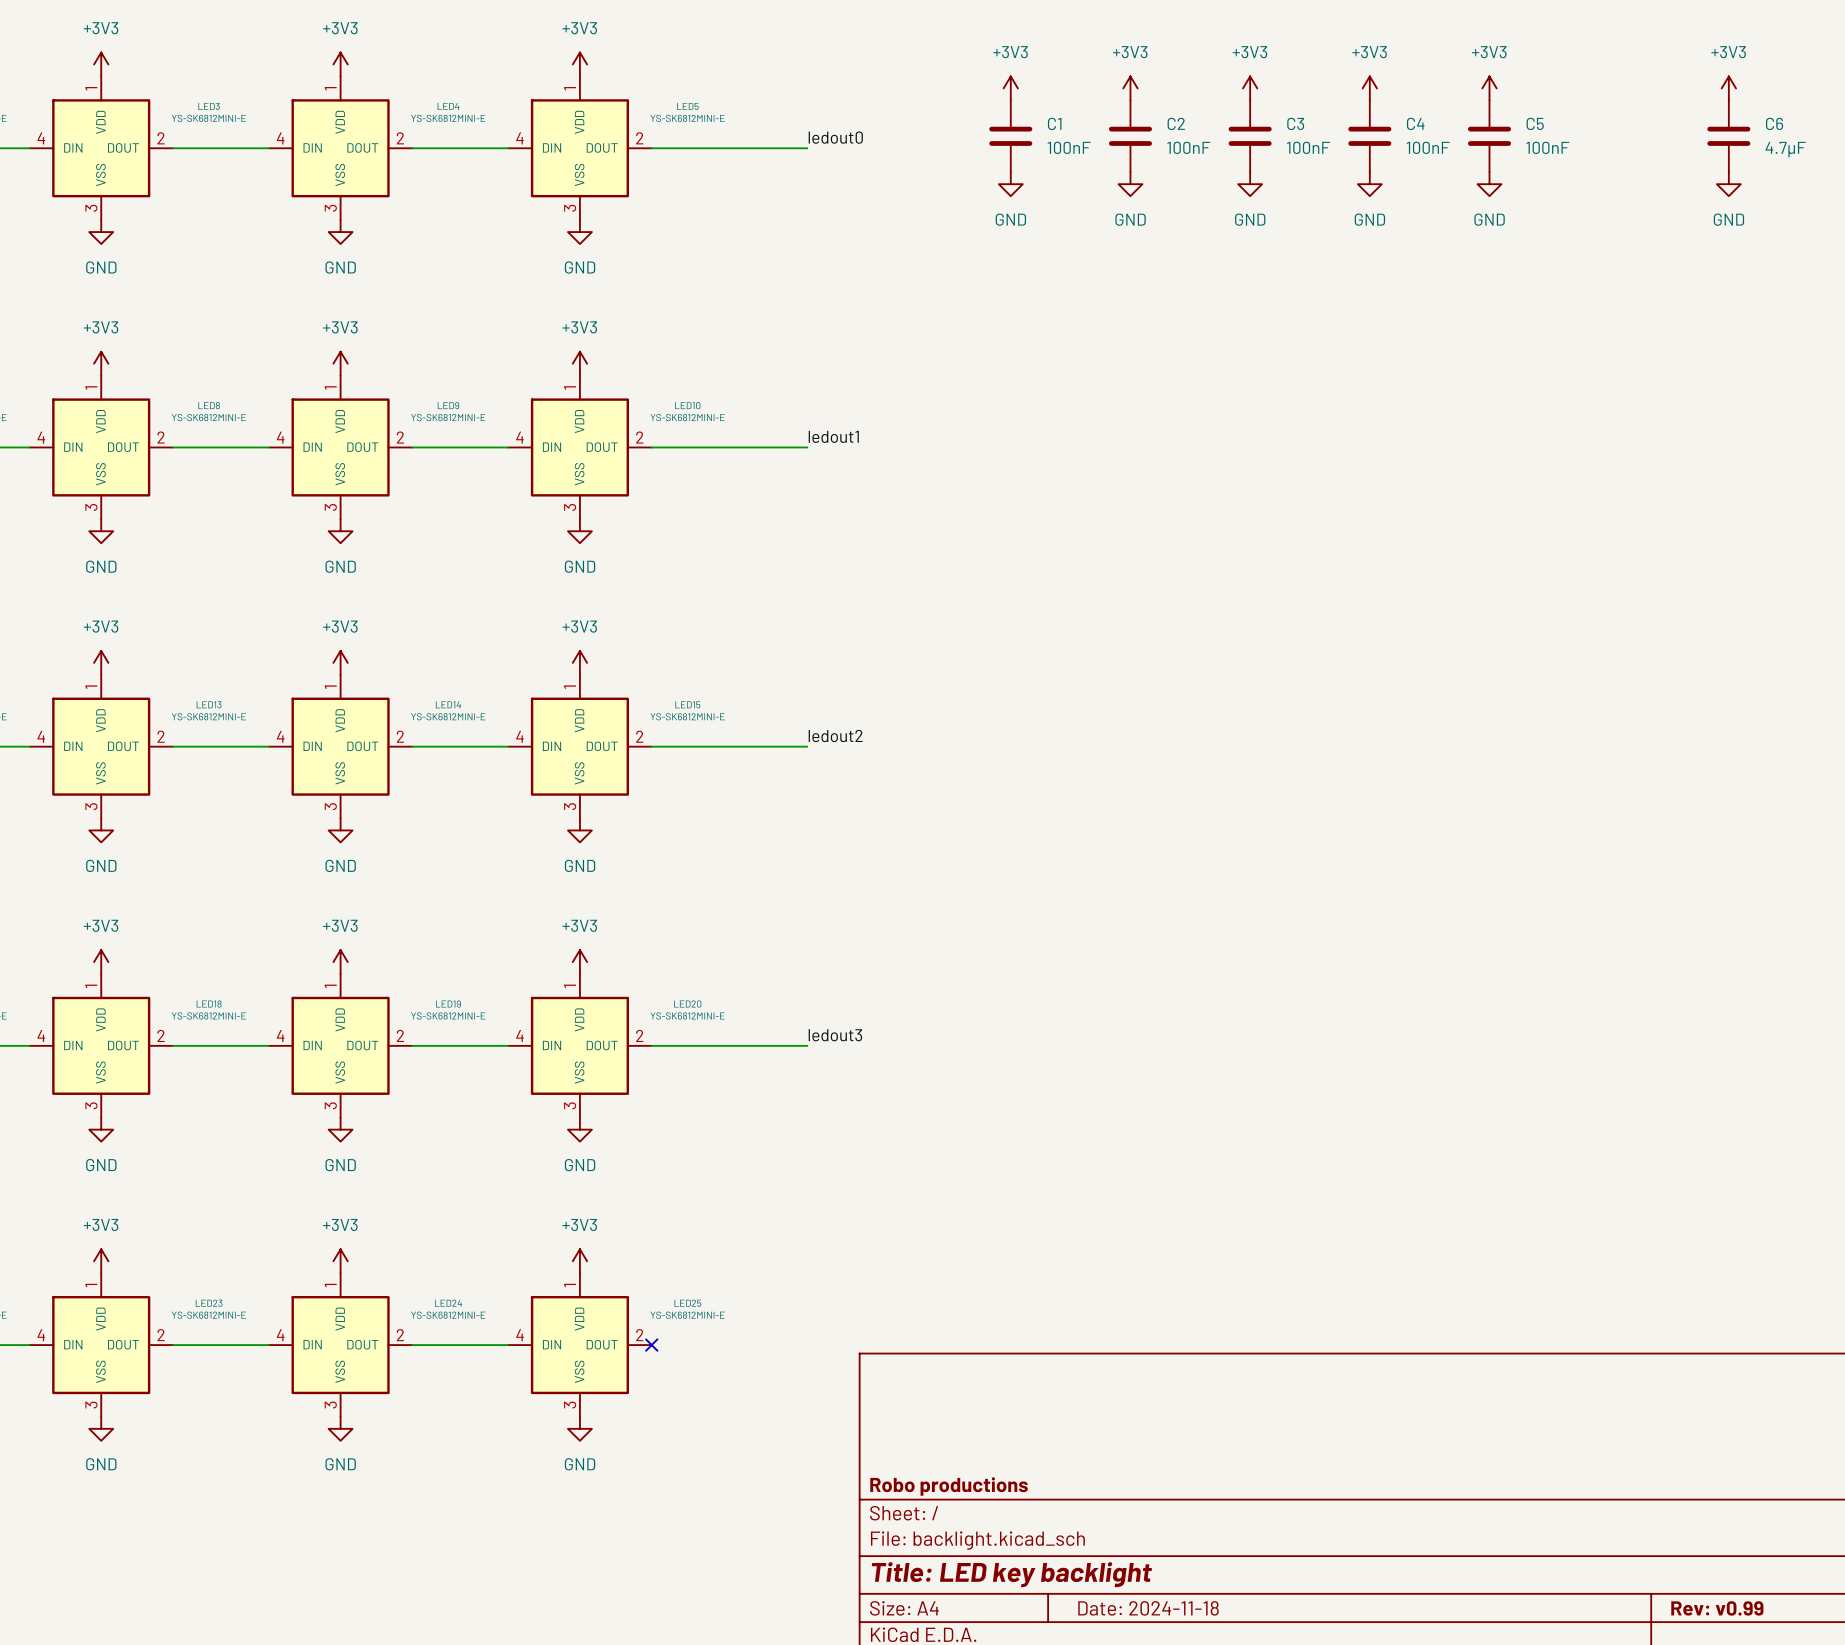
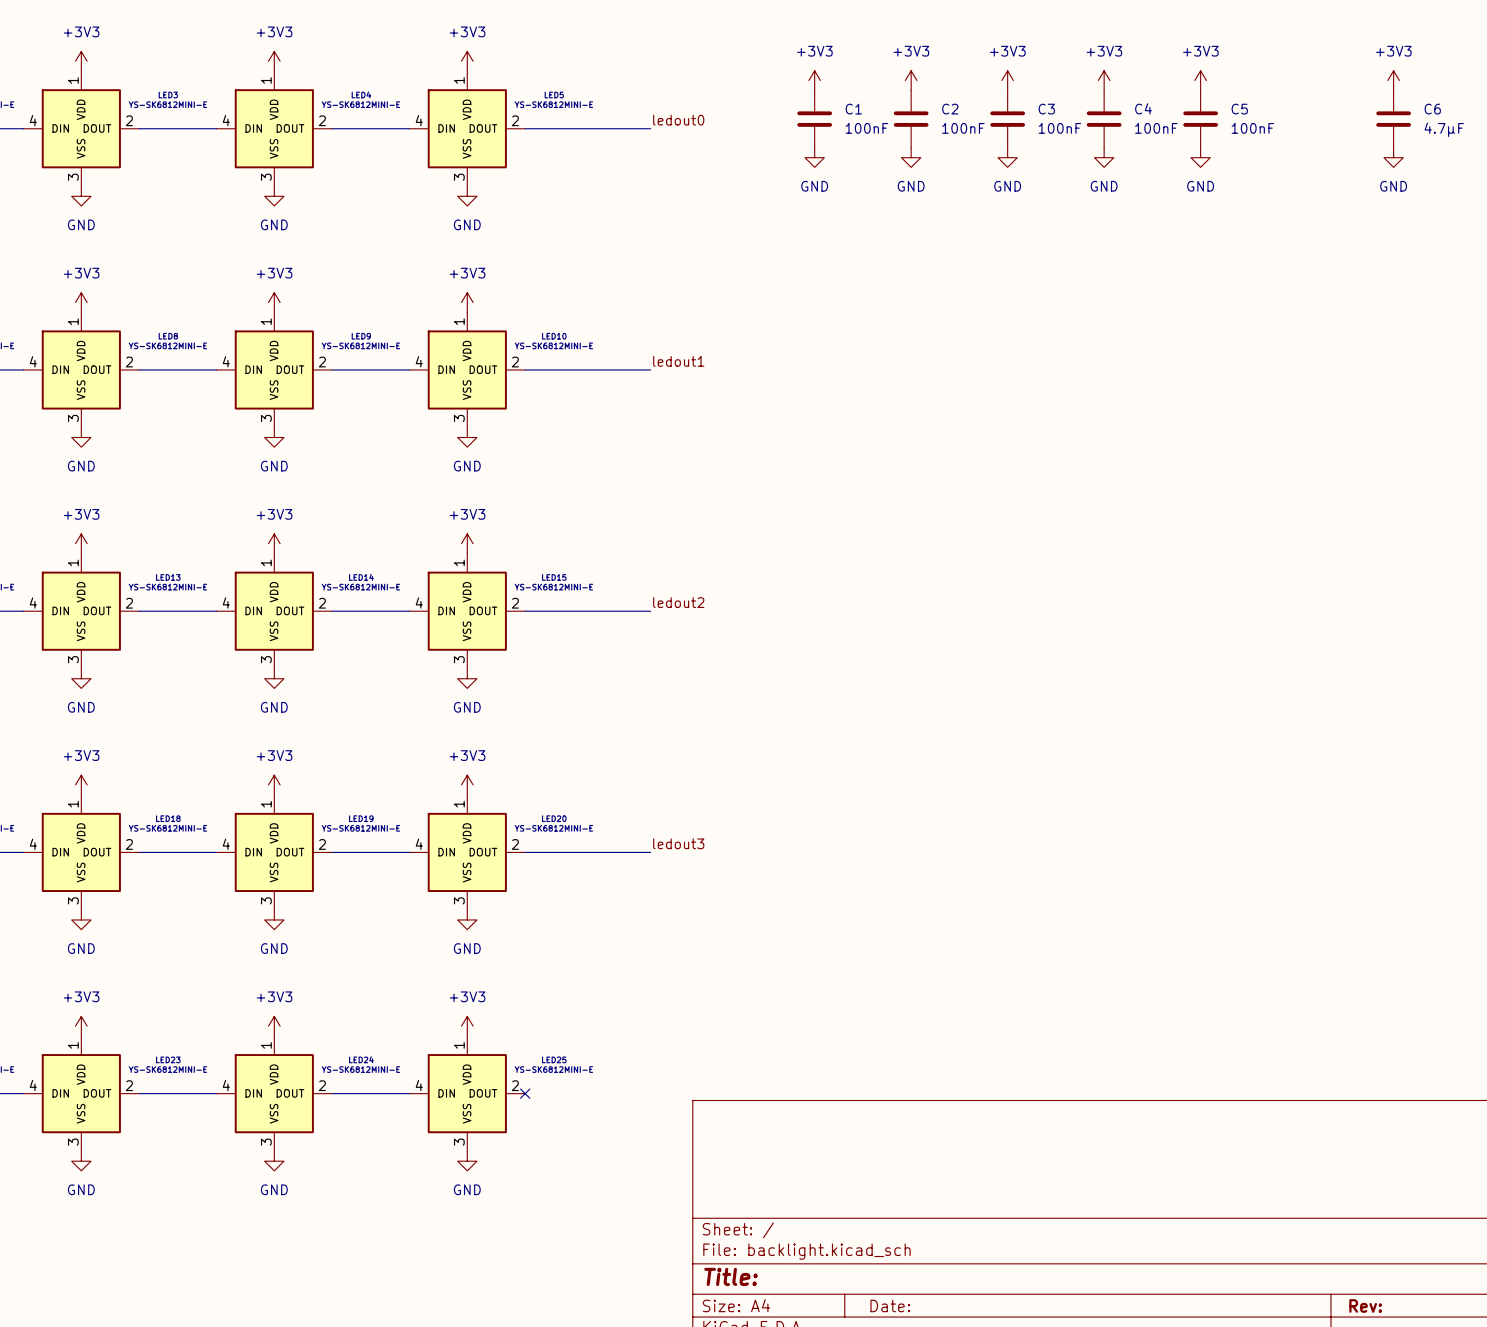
title block: Robo productions (949, 1486) -> none
title block: Title: LED key backlight (1011, 1574) -> Title: (731, 1276)
title block: Date: 2024-11-18 (1148, 1608) -> Date: (890, 1305)
title block: Rev: v0.99 (1717, 1608) -> Rev: (1365, 1305)

